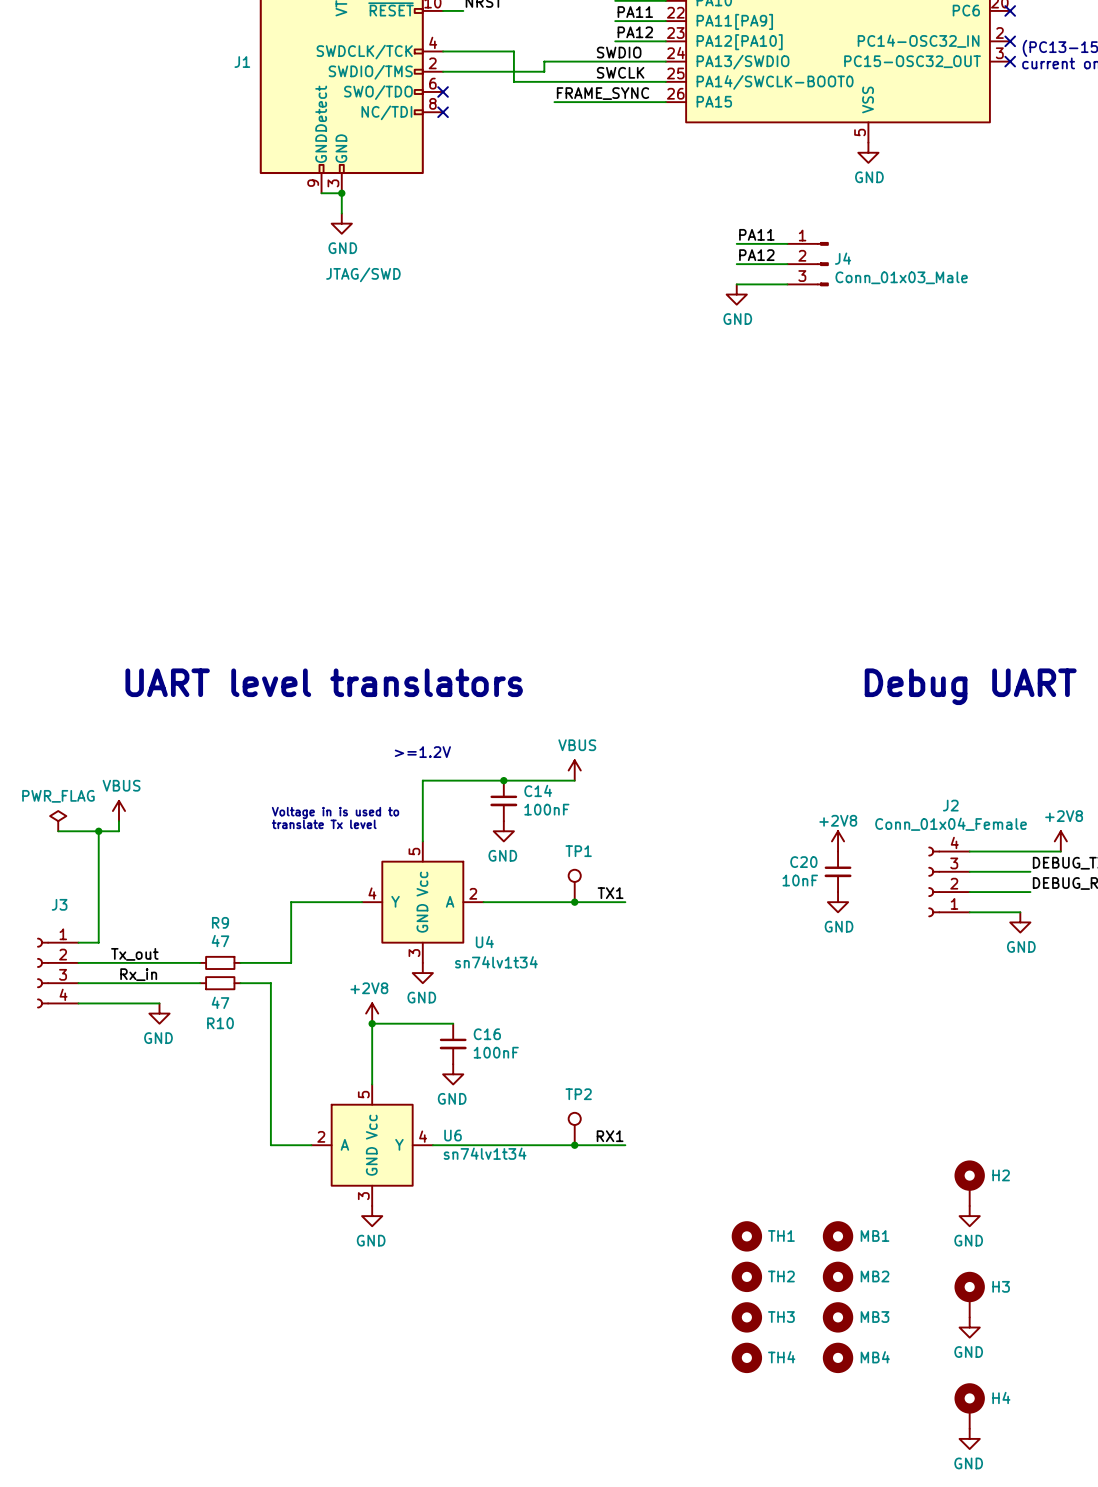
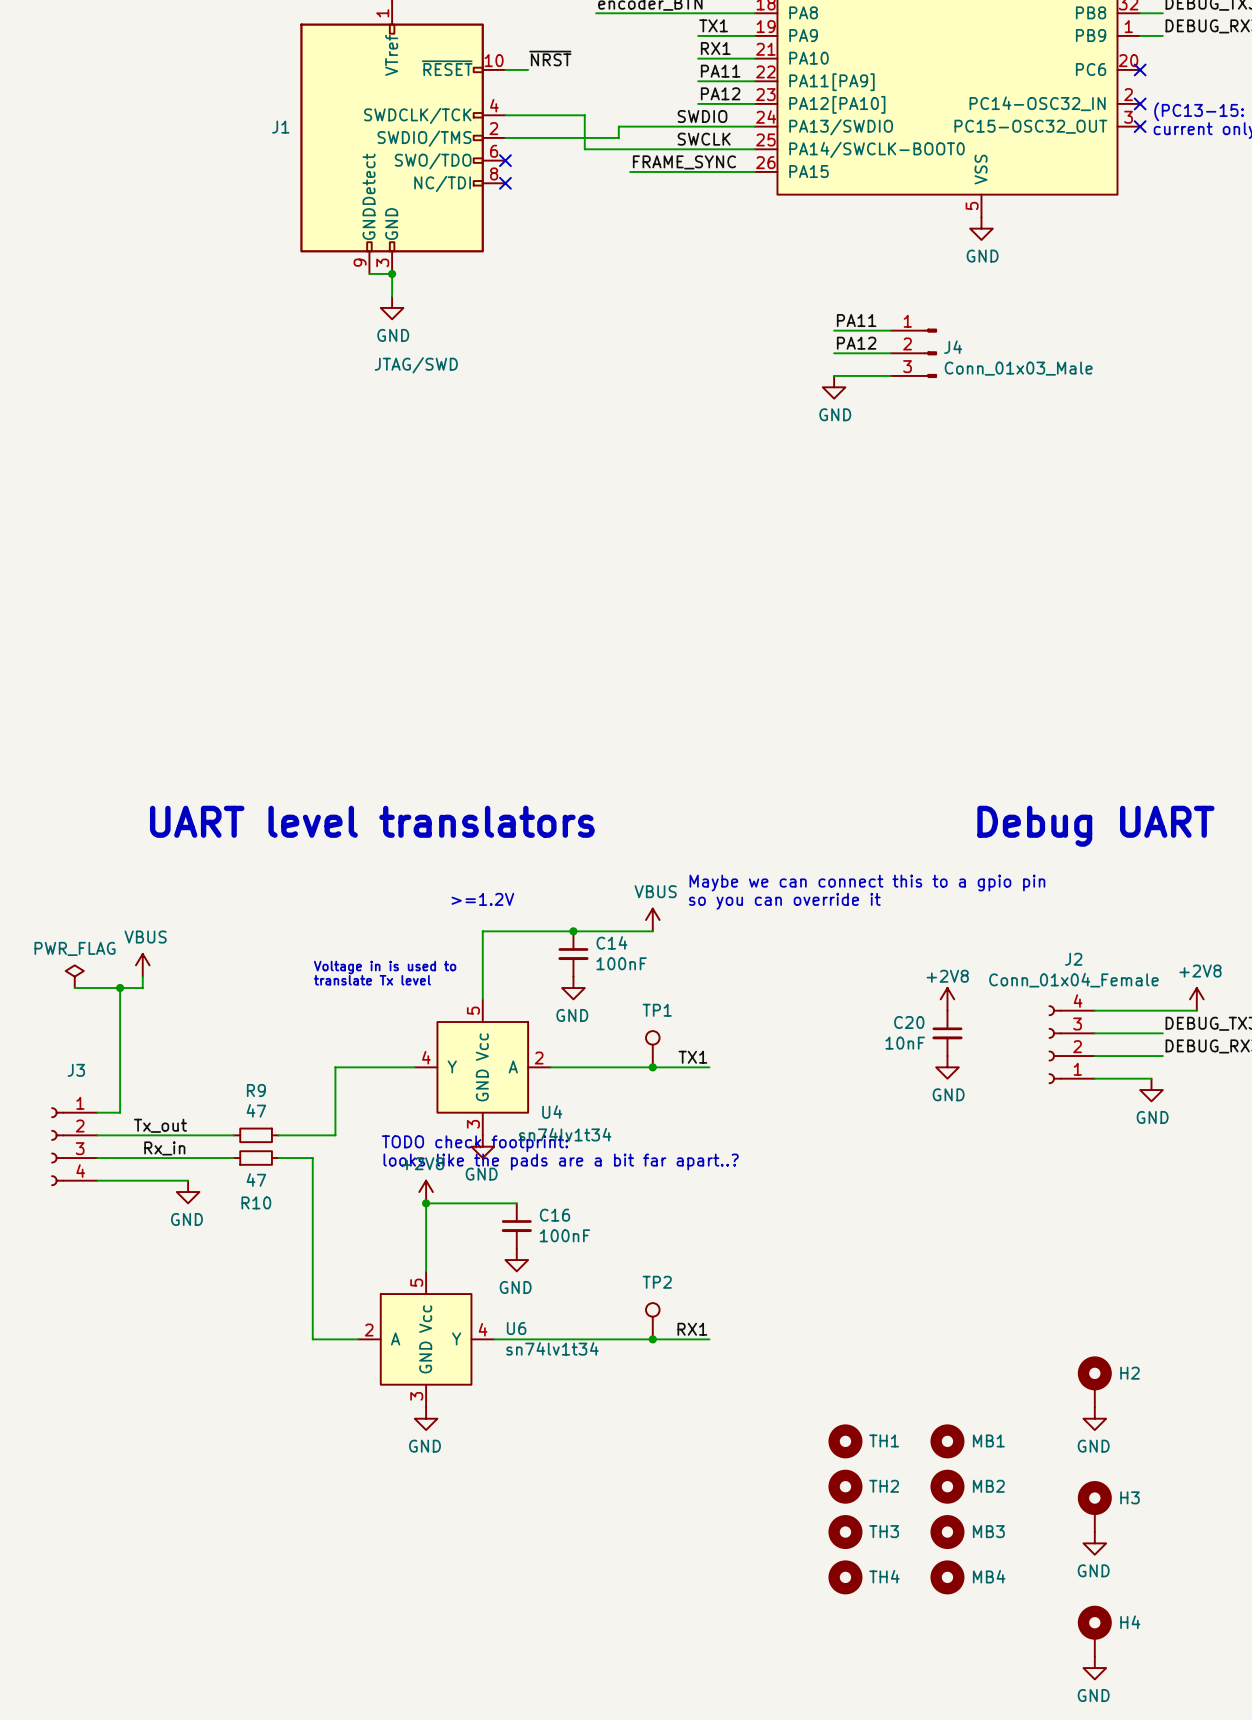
text: none -> Maybe we can connect this to a gpio pin (867, 883)
text: none -> so you can override it (784, 901)
text: none -> TODO check footprint: (475, 1143)
text: none -> looks like the pads are a bit far apart..? (561, 1161)

